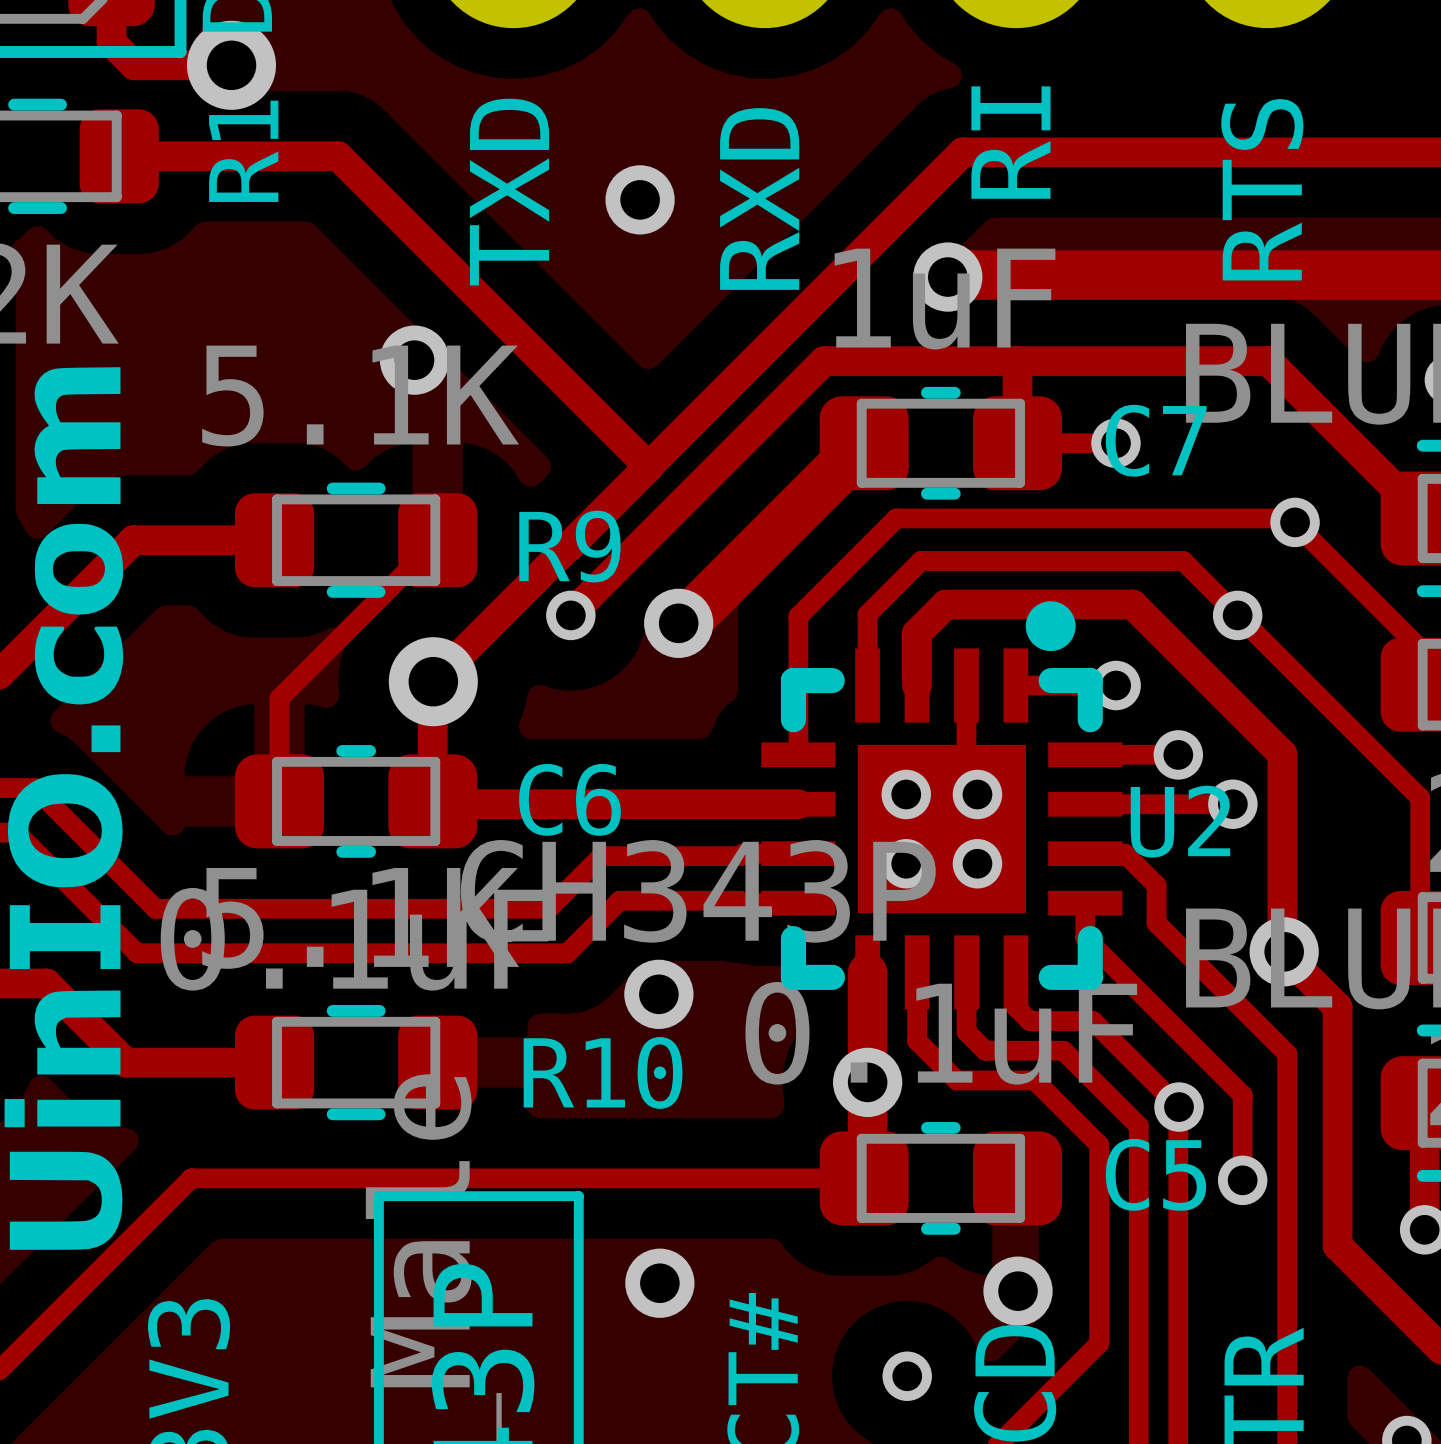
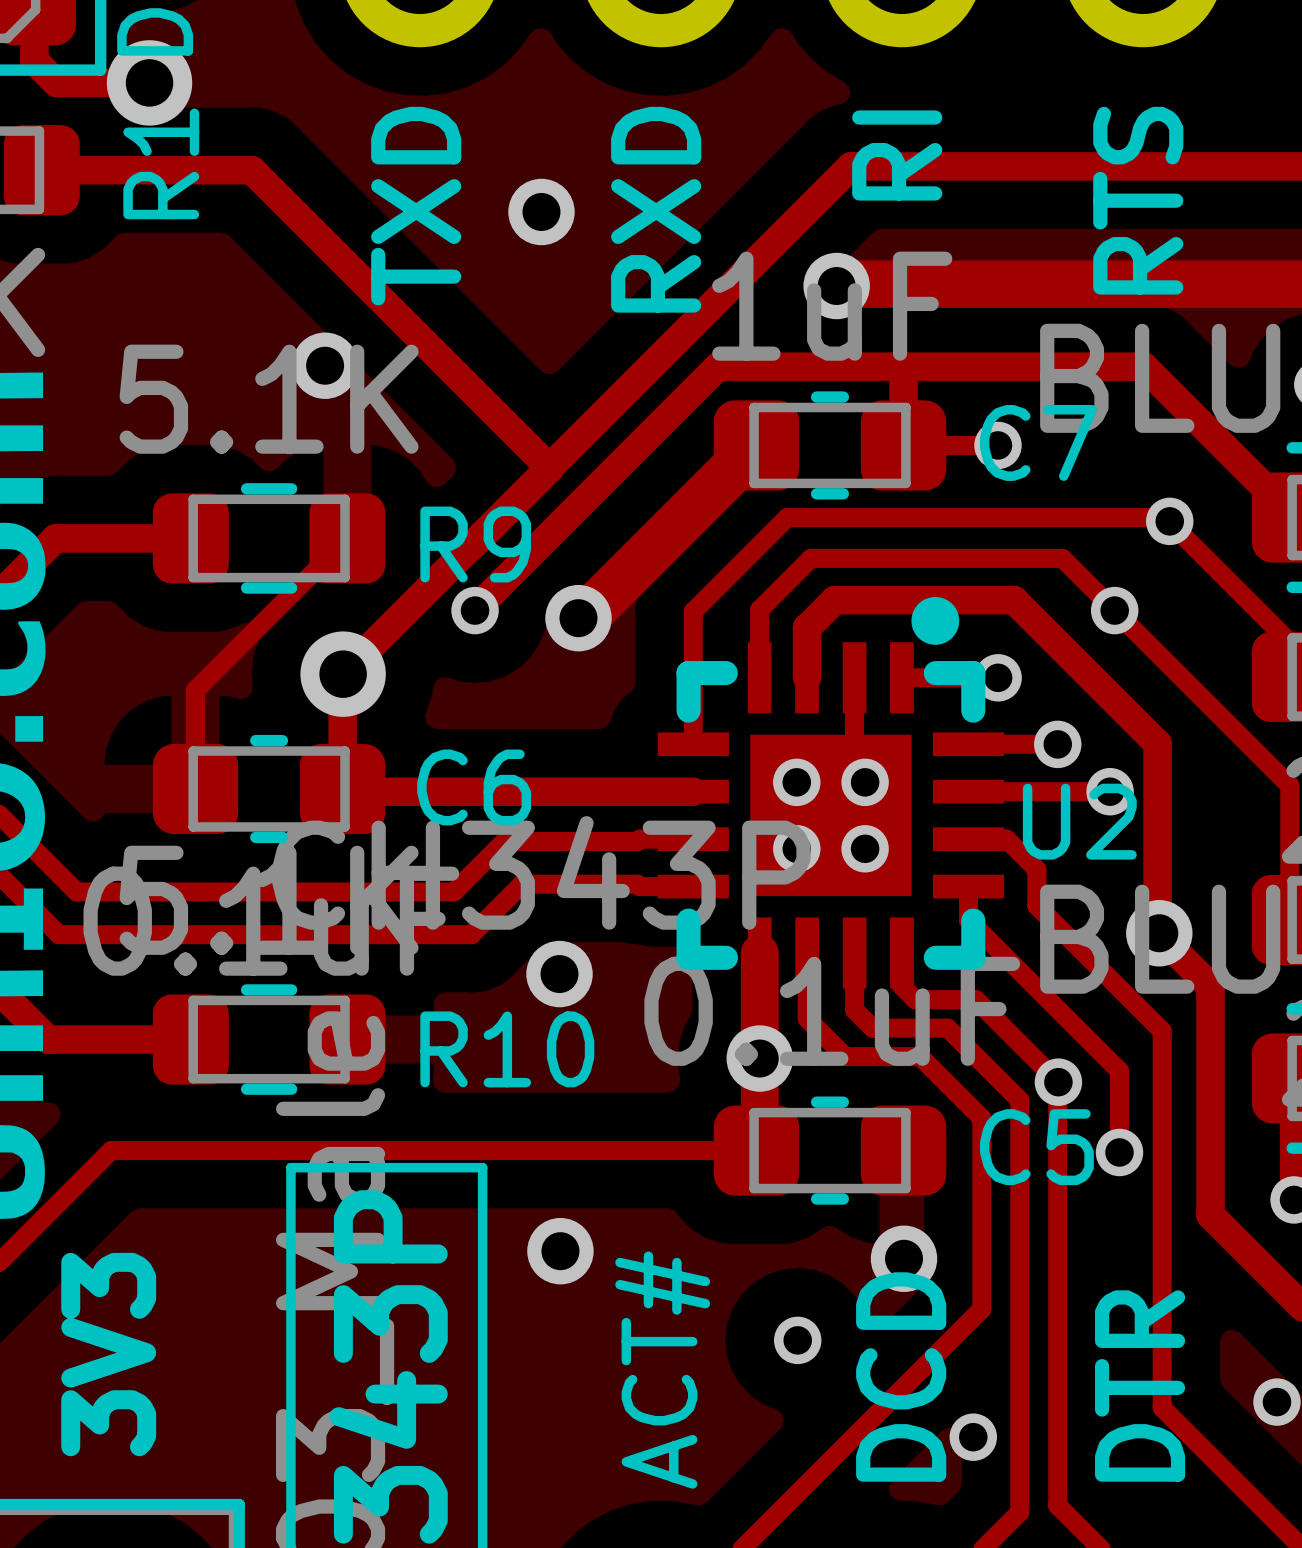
U2 name position: U2 (1180, 821) -> U2 (1079, 821)

